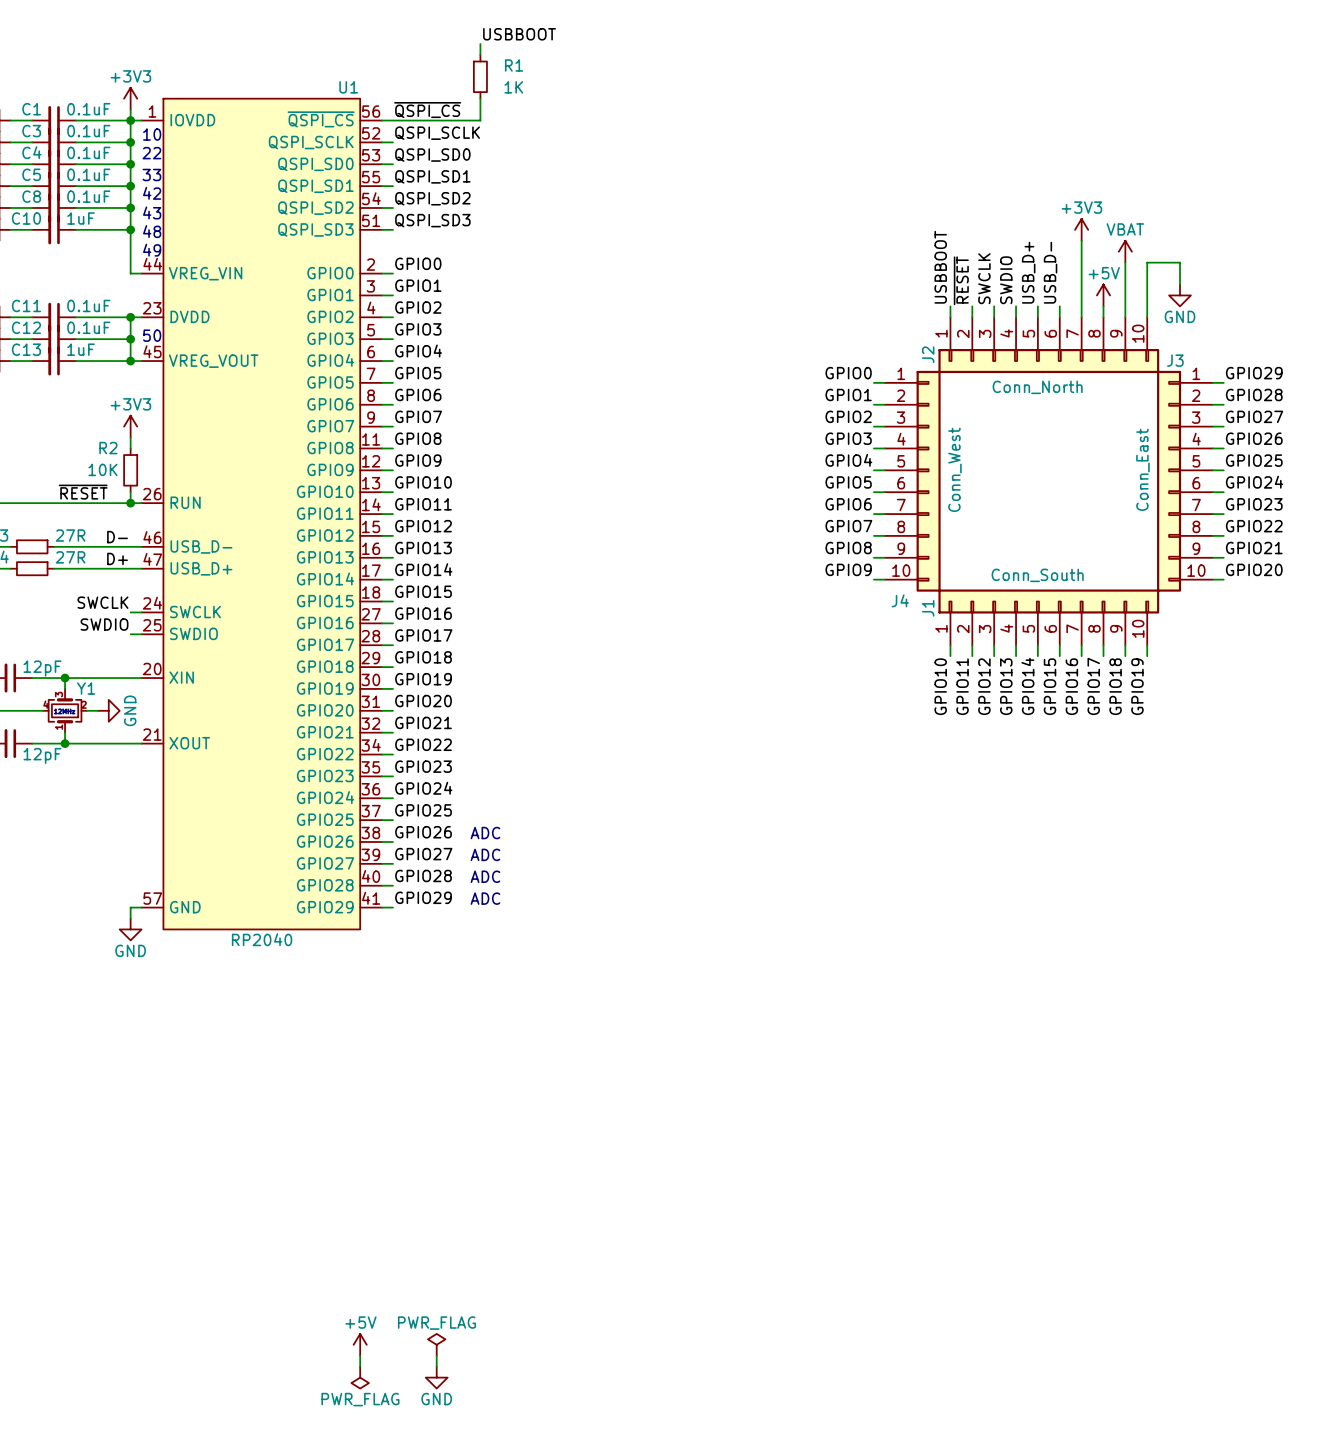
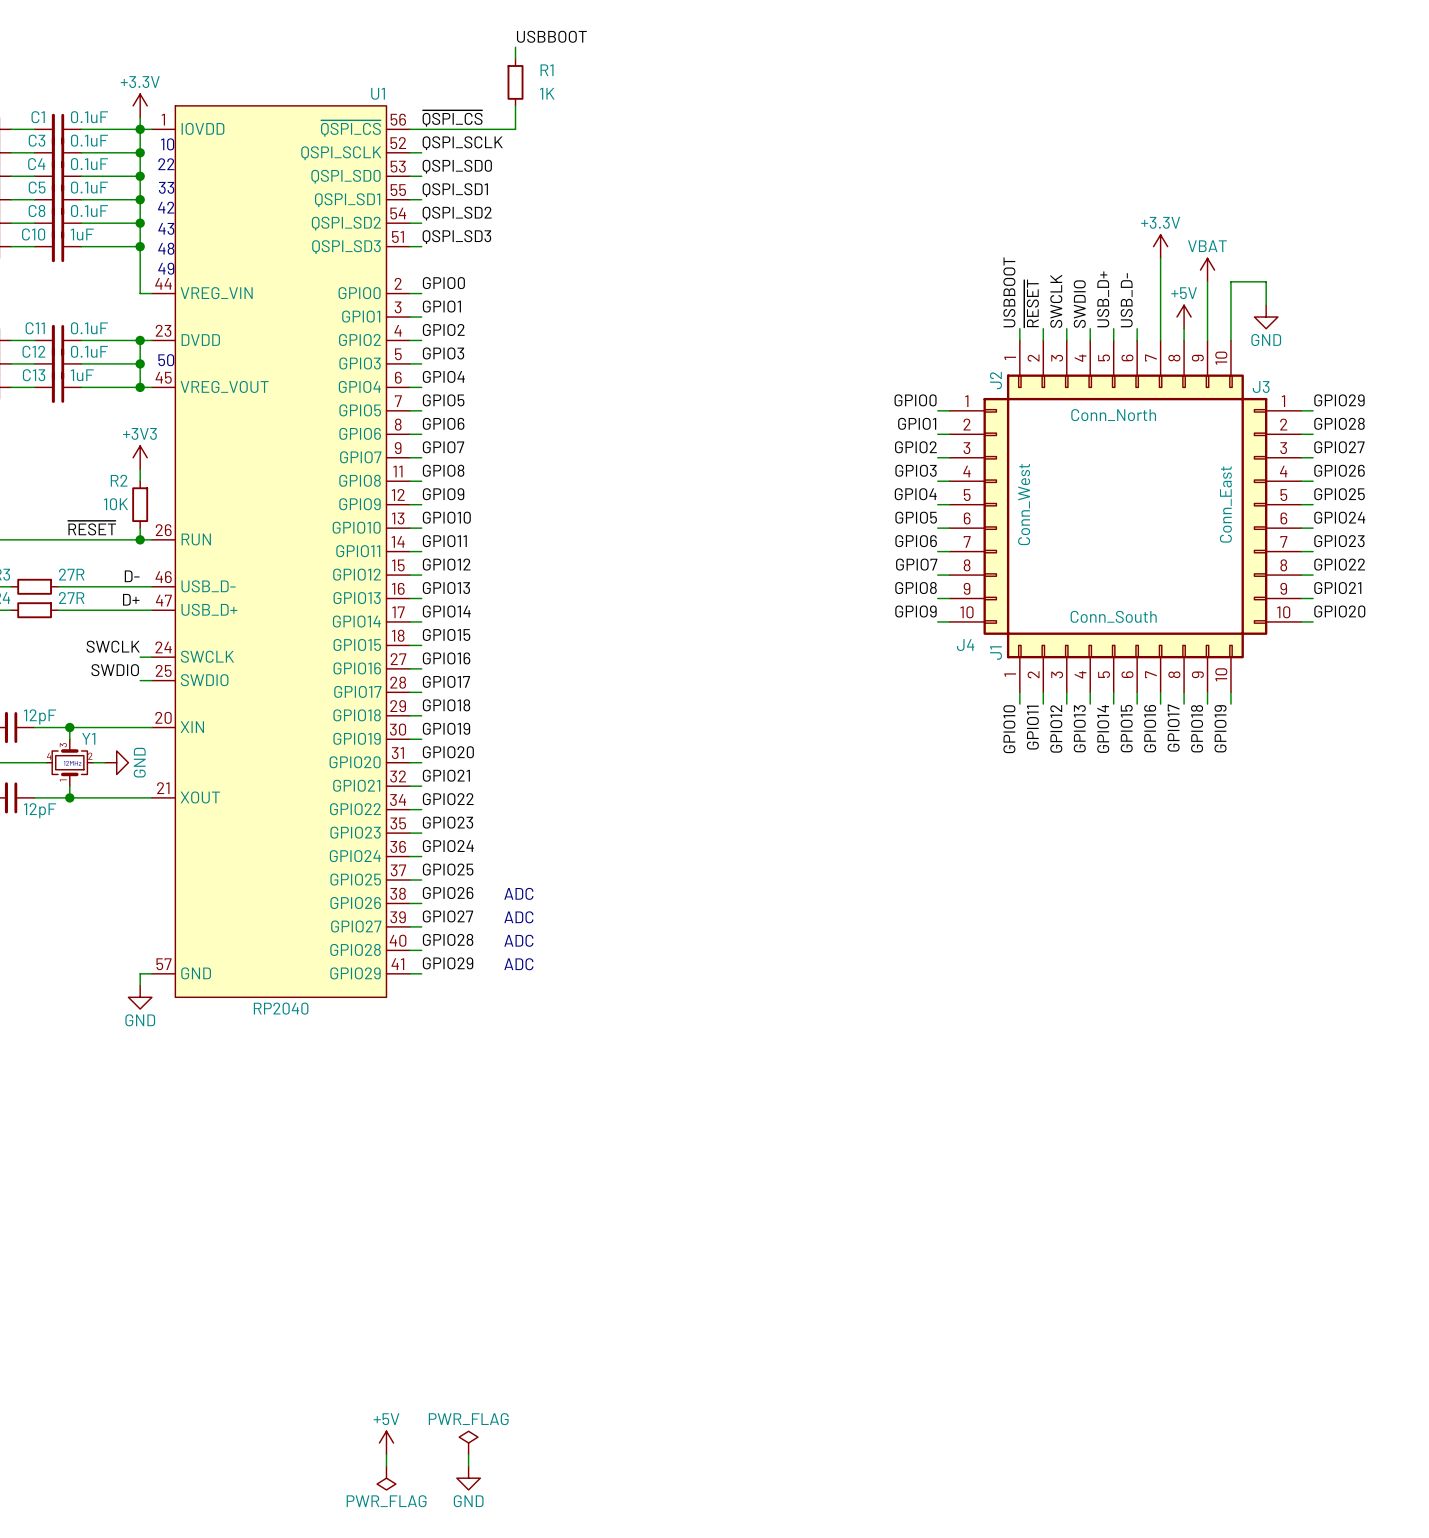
power symbol: +3V3 (130, 98) -> +3.3V (140, 105)
power symbol: +3V3 (1081, 229) -> +3.3V (1160, 246)

